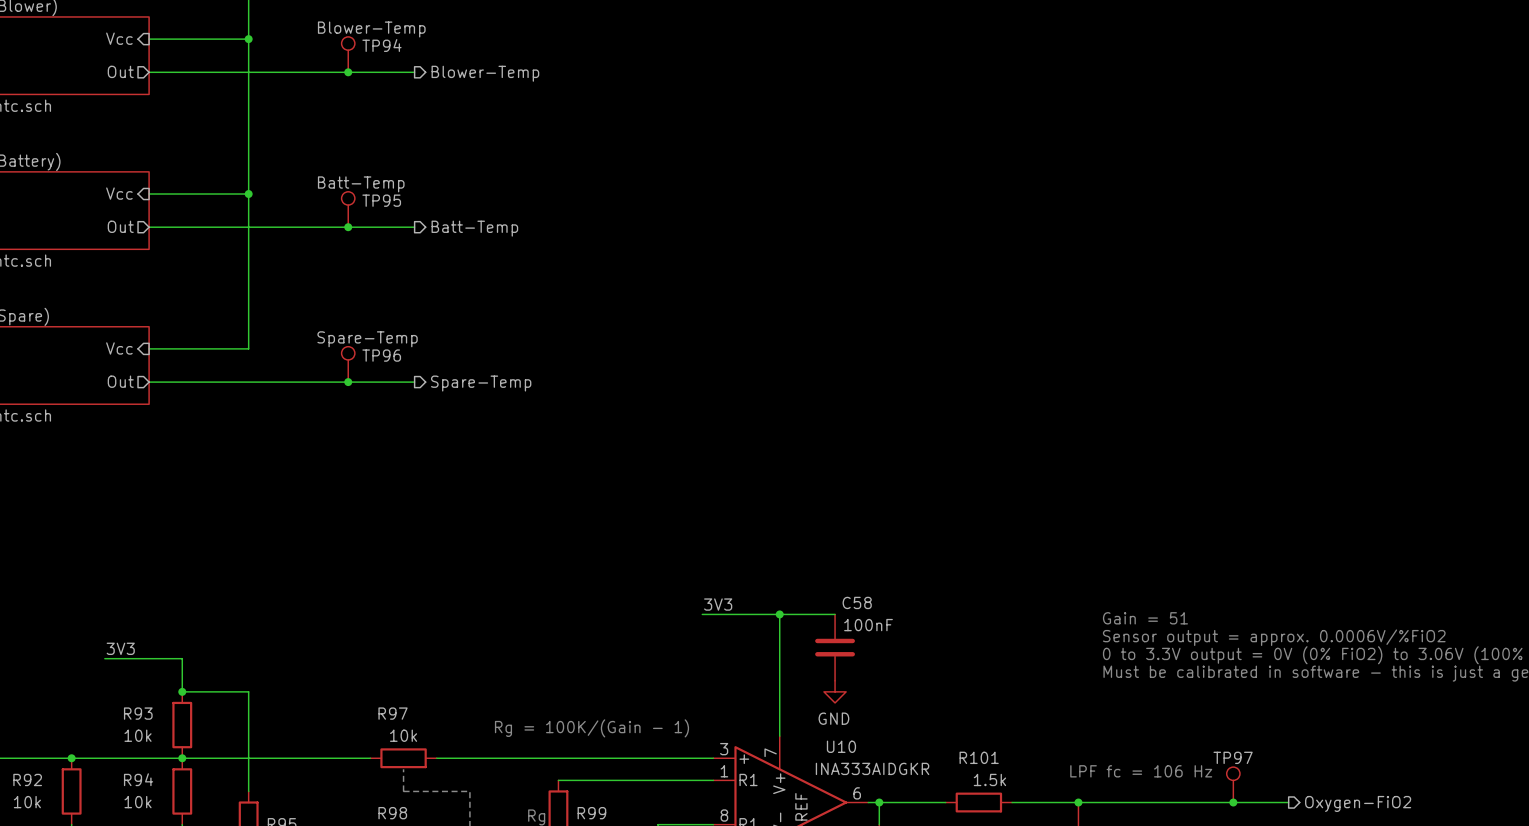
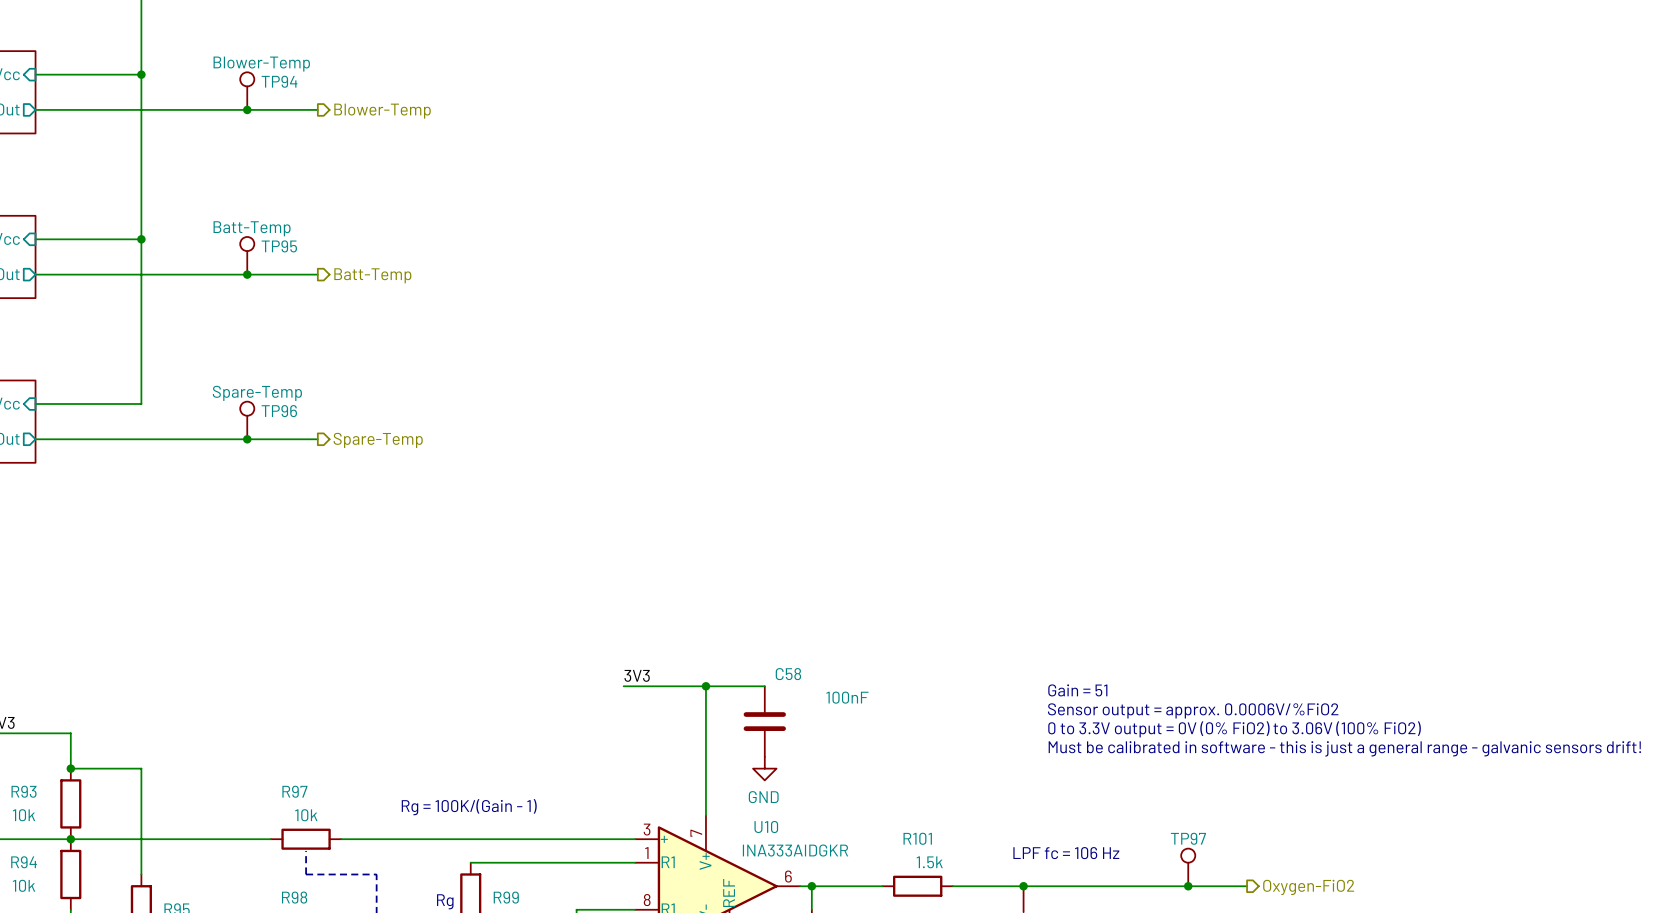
C58 value position: 100nF (868, 625) -> 100nF (847, 697)

